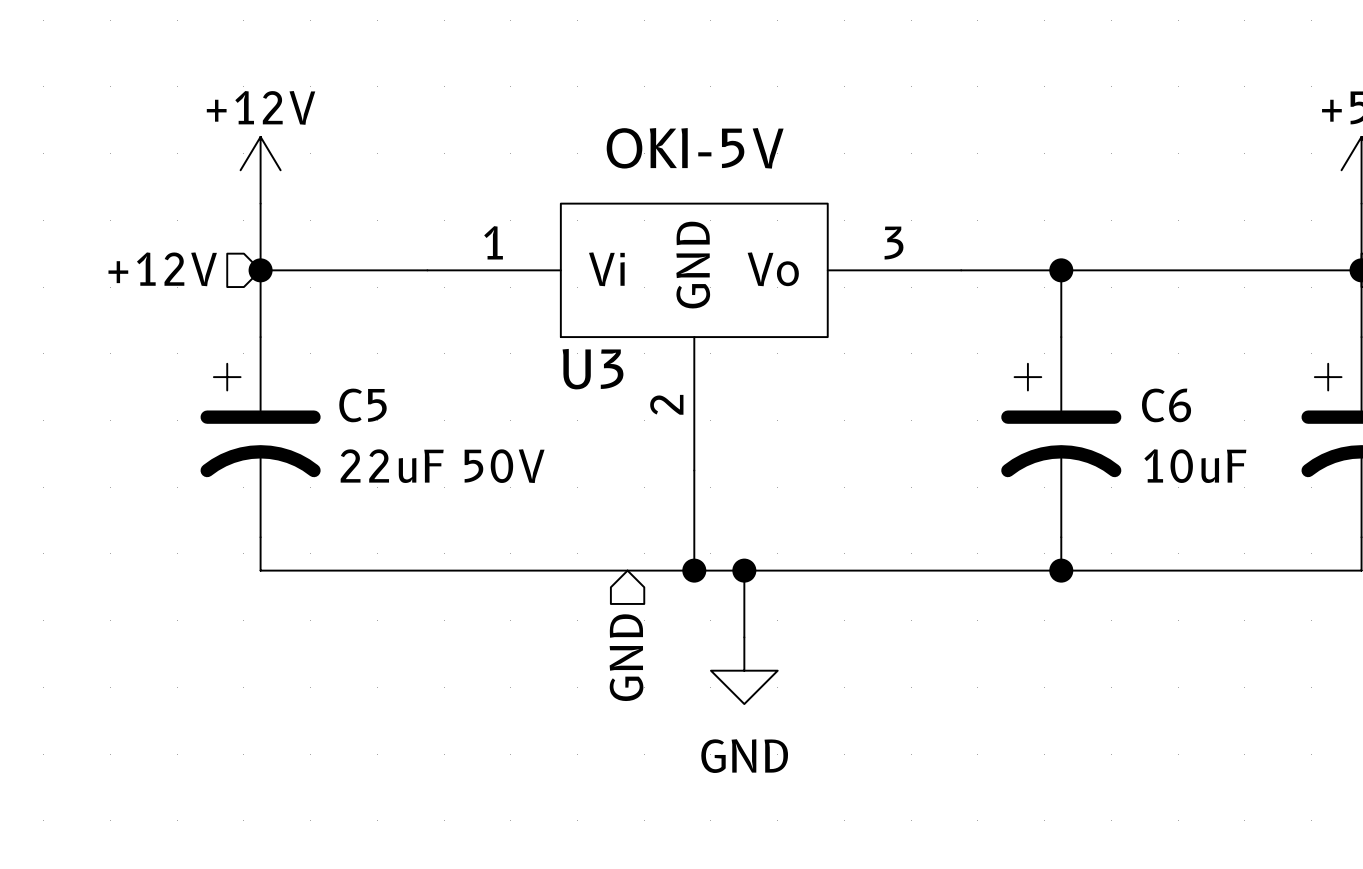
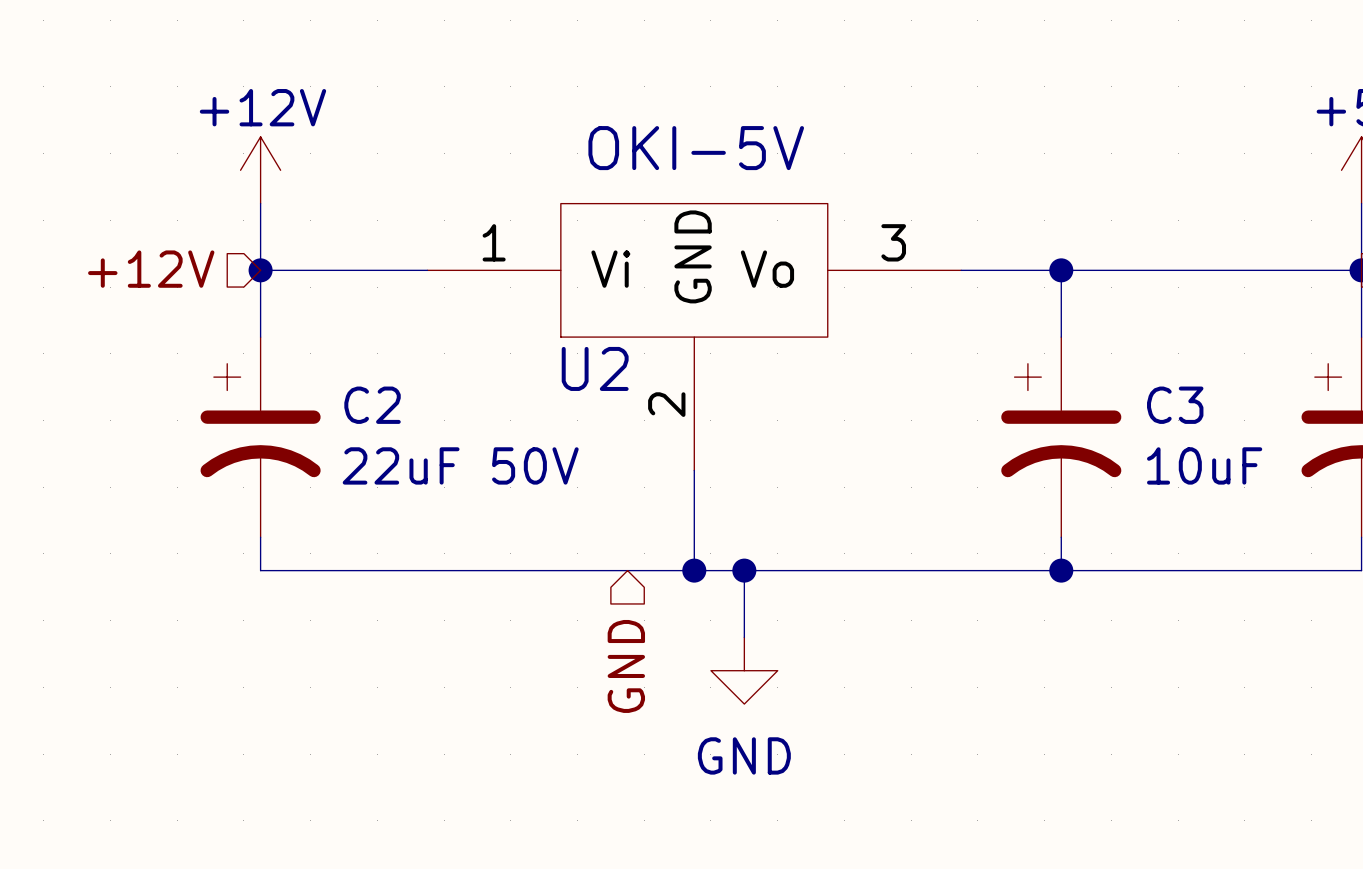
U3 name: U3 (593, 369) -> U2 (595, 368)
C5 name: C5 (362, 405) -> C2 (372, 405)
C6 name: C6 (1166, 405) -> C3 (1175, 405)

